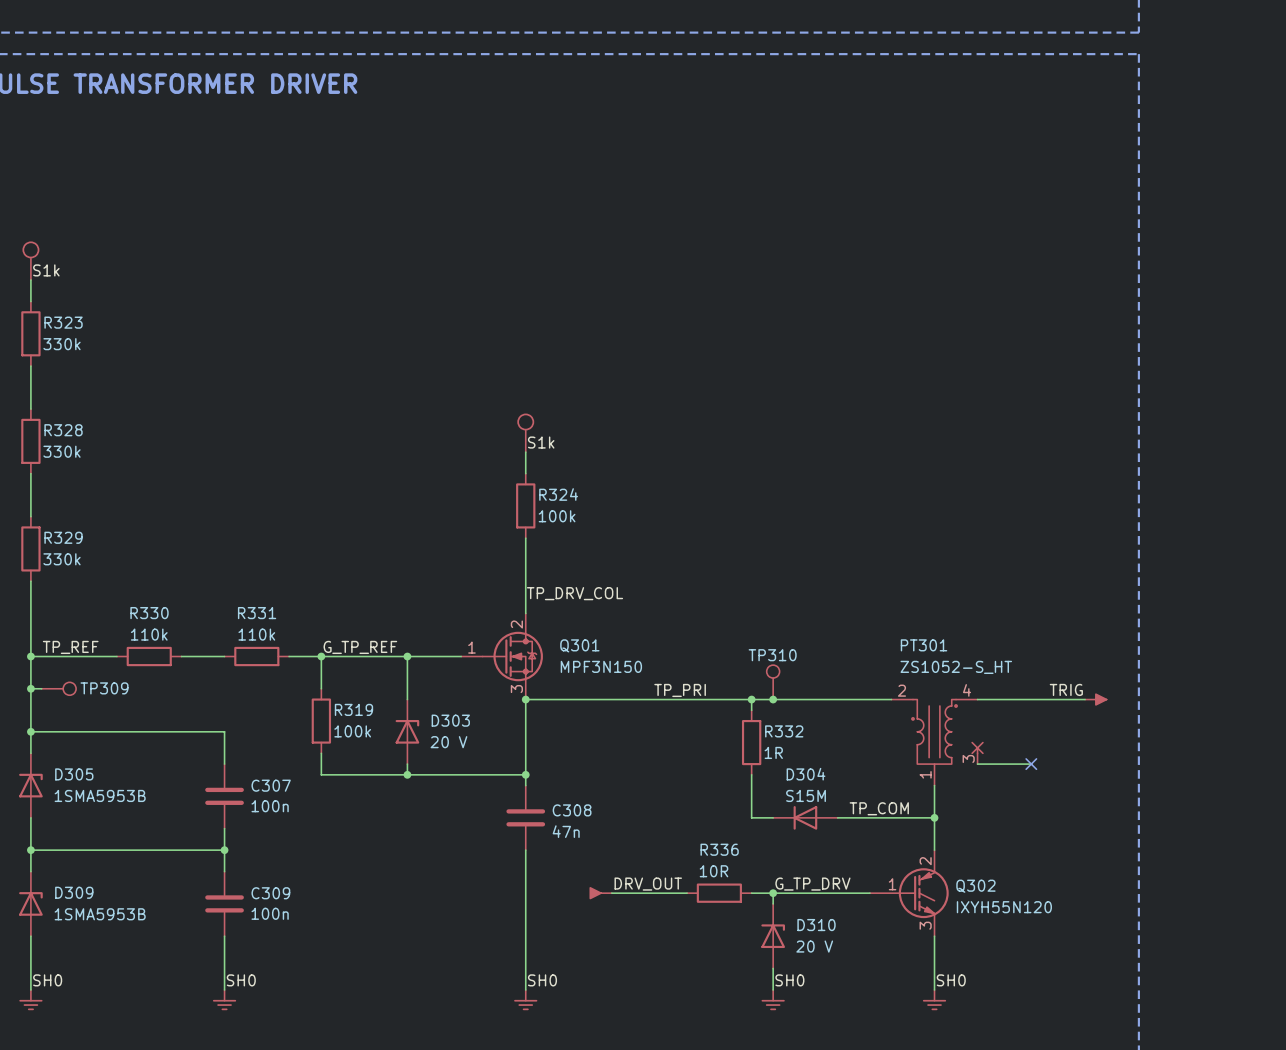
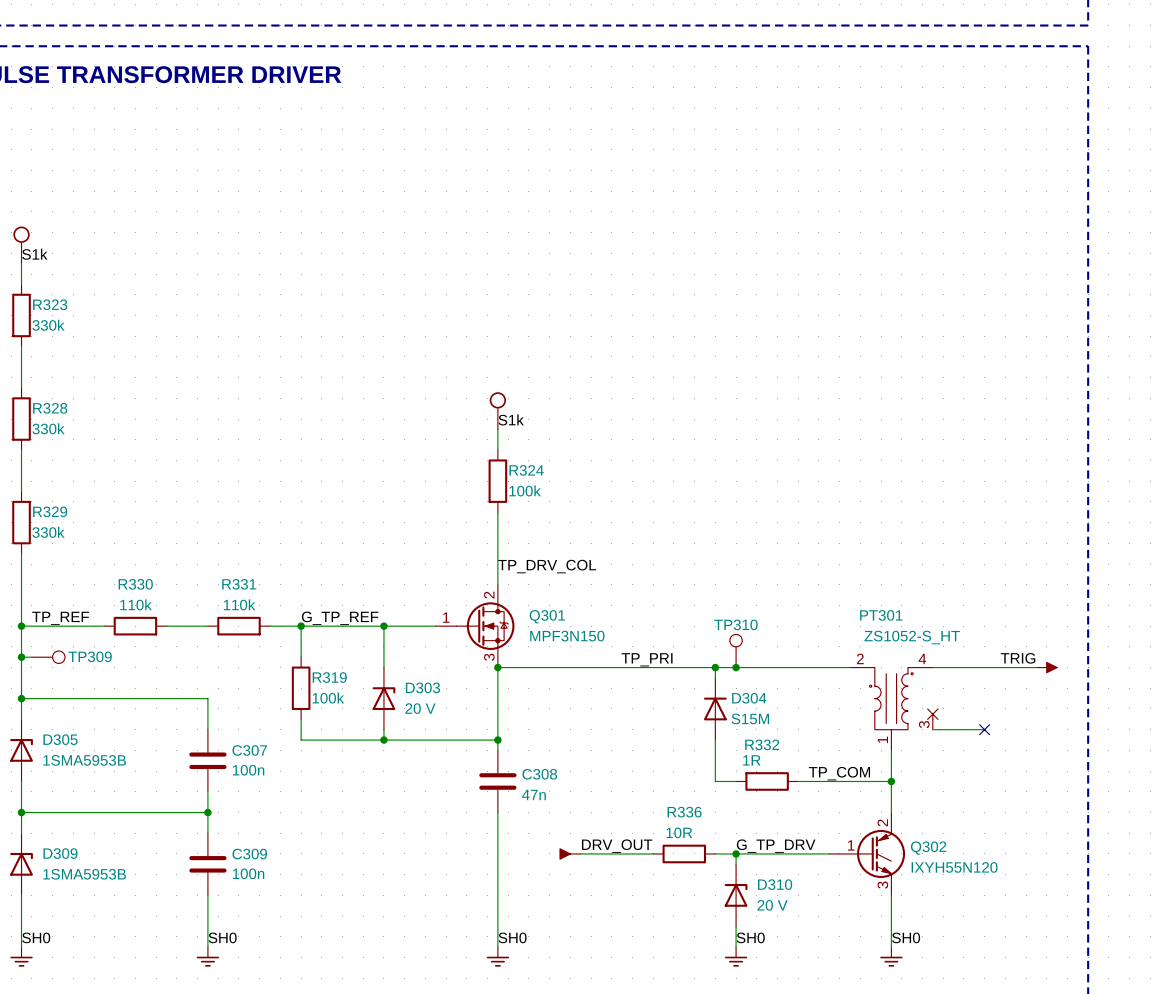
R332 name position: R332 (784, 731) -> R332 (762, 744)
R332 rotation: 0° (751, 742) -> 90° clockwise (767, 781)
R332 position: (751, 742) -> (767, 781)
R332 value position: 1R (773, 752) -> 1R (751, 760)
D304 value position: S15M (806, 795) -> S15M (750, 718)
D304 rotation: 0° (805, 817) -> 90° clockwise (715, 708)
D304 position: (805, 817) -> (715, 708)

